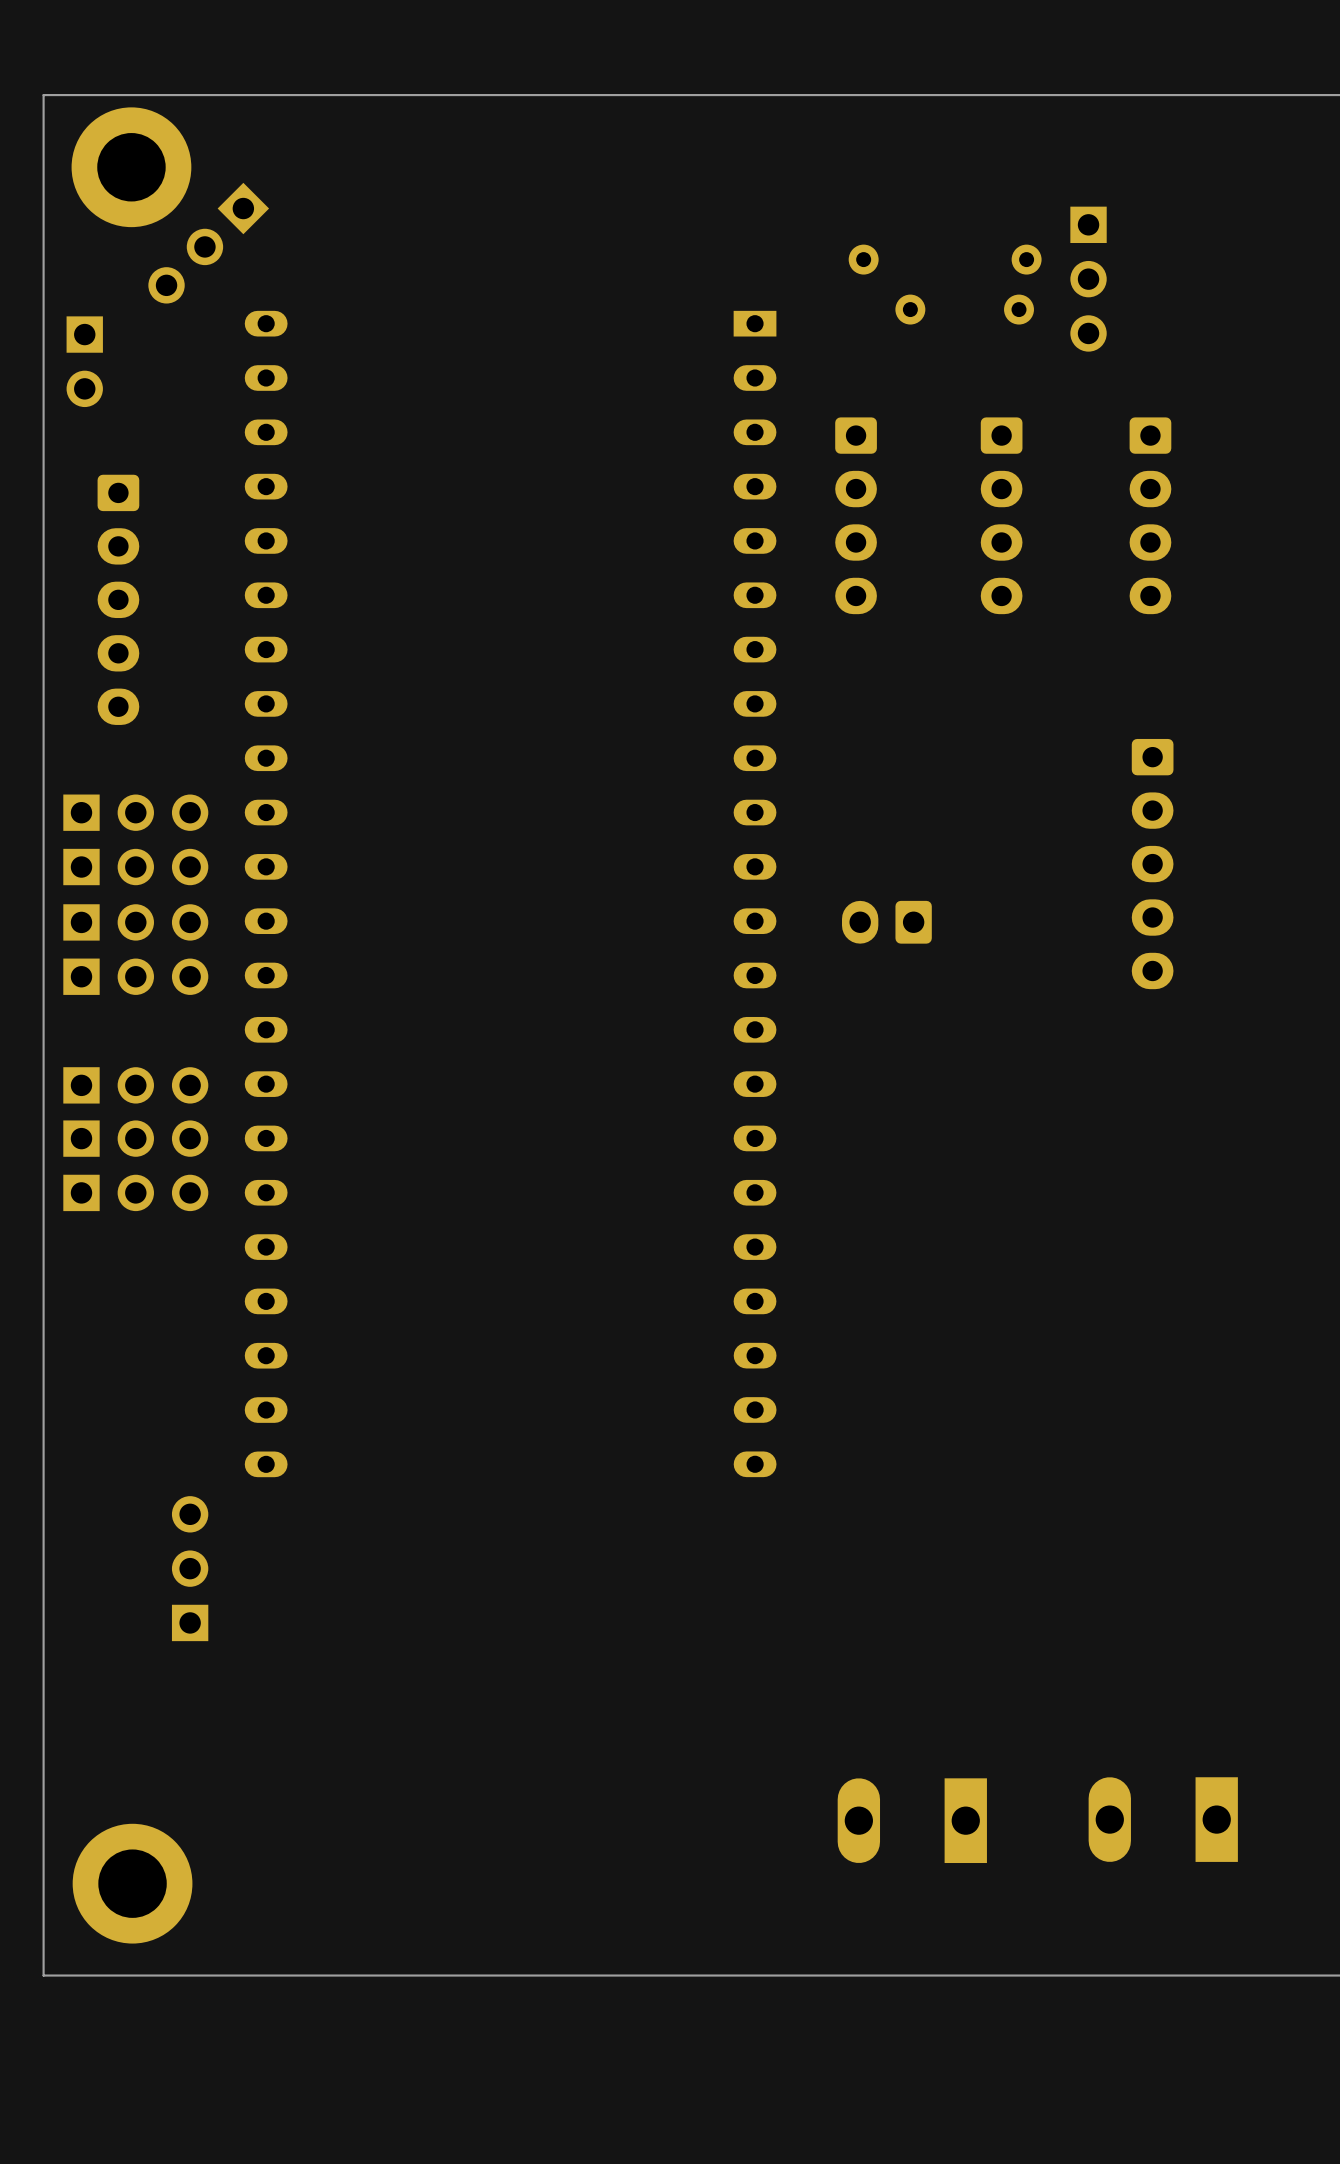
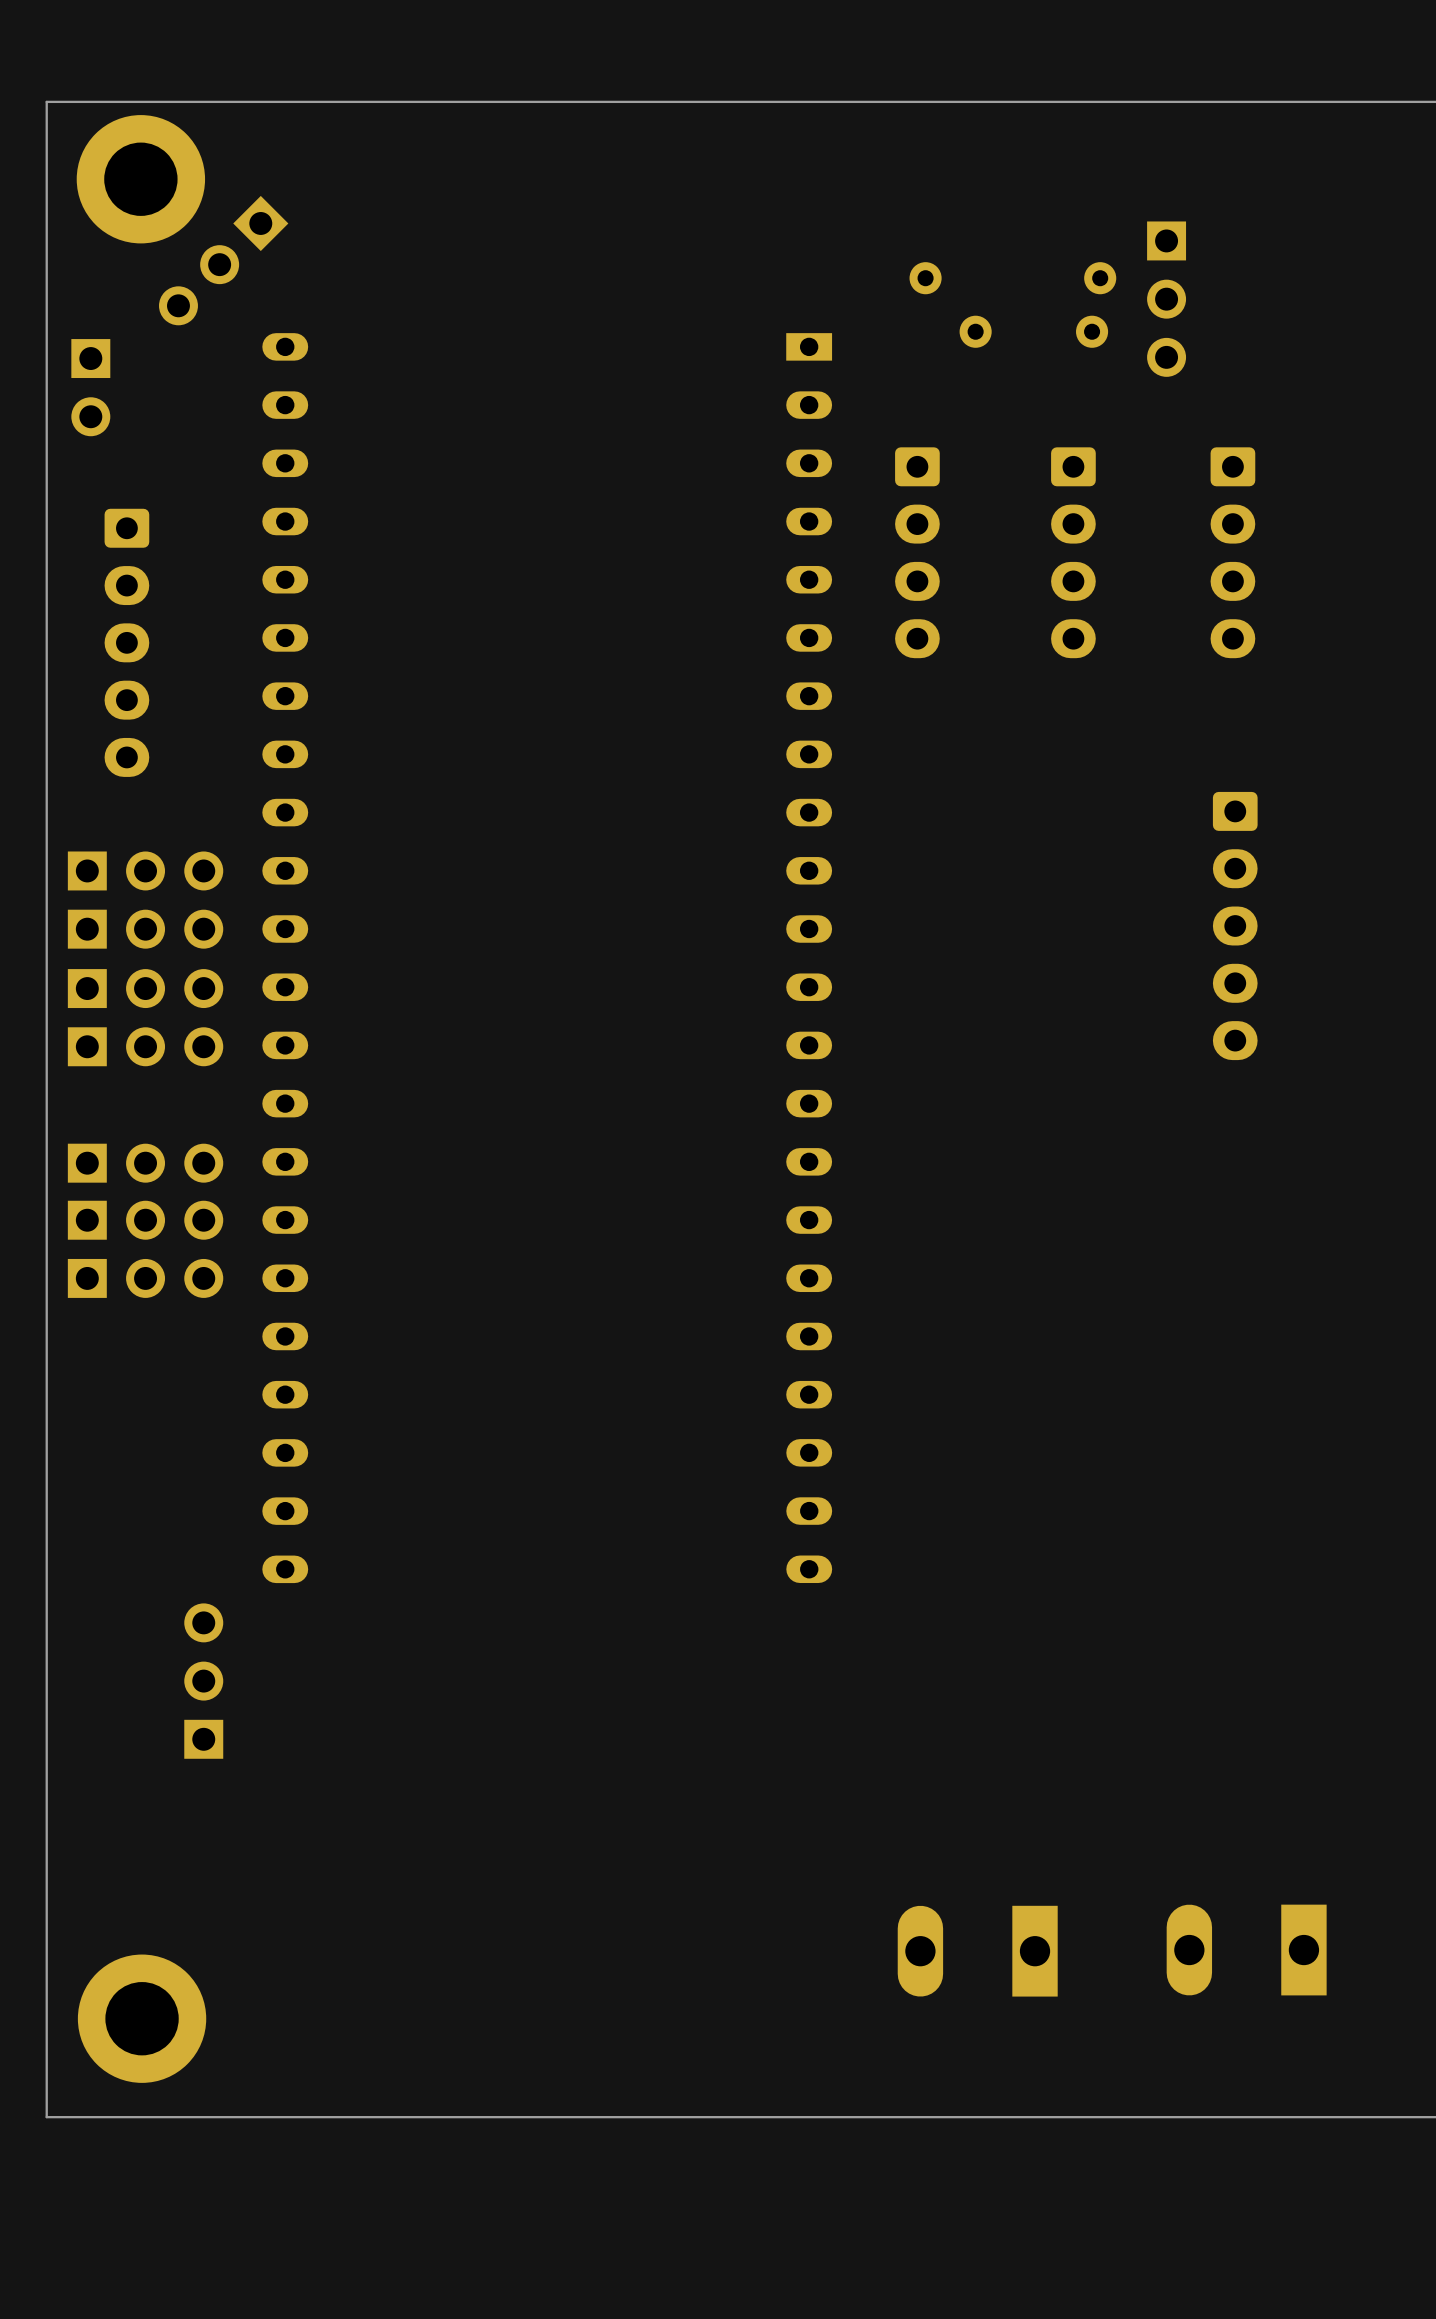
part: (886, 922) -> none

